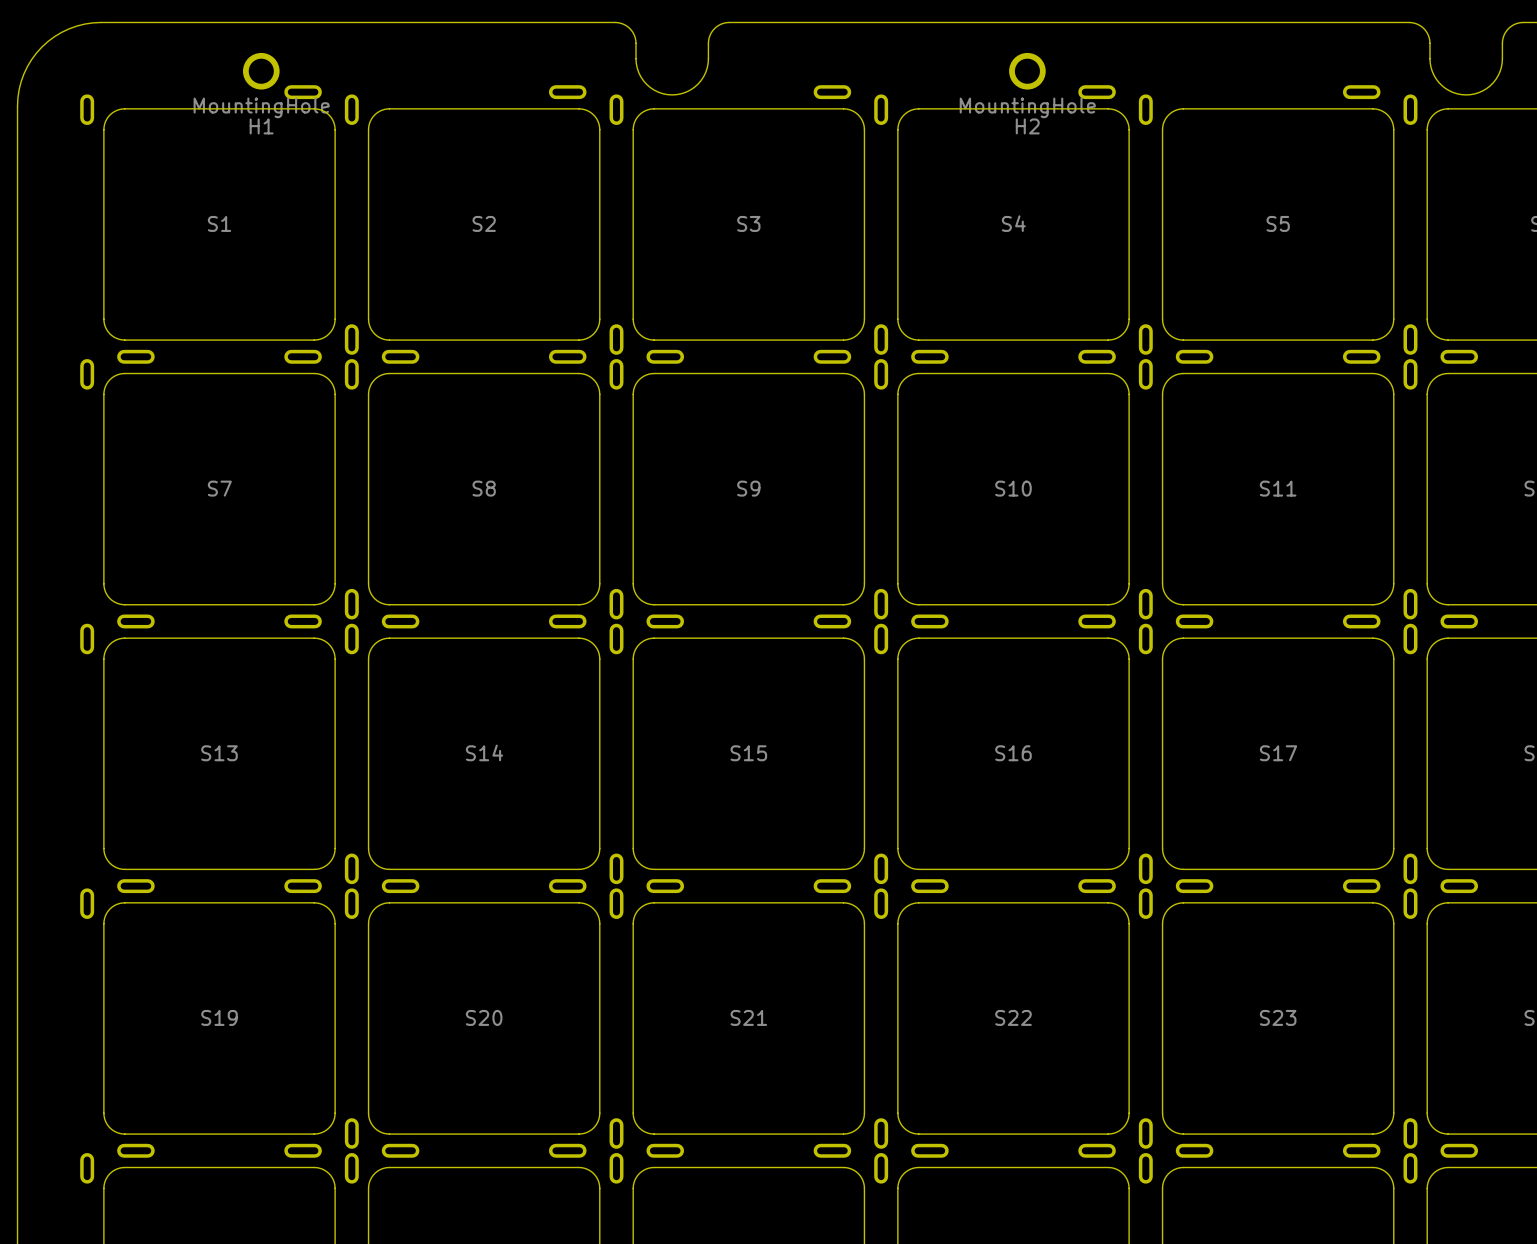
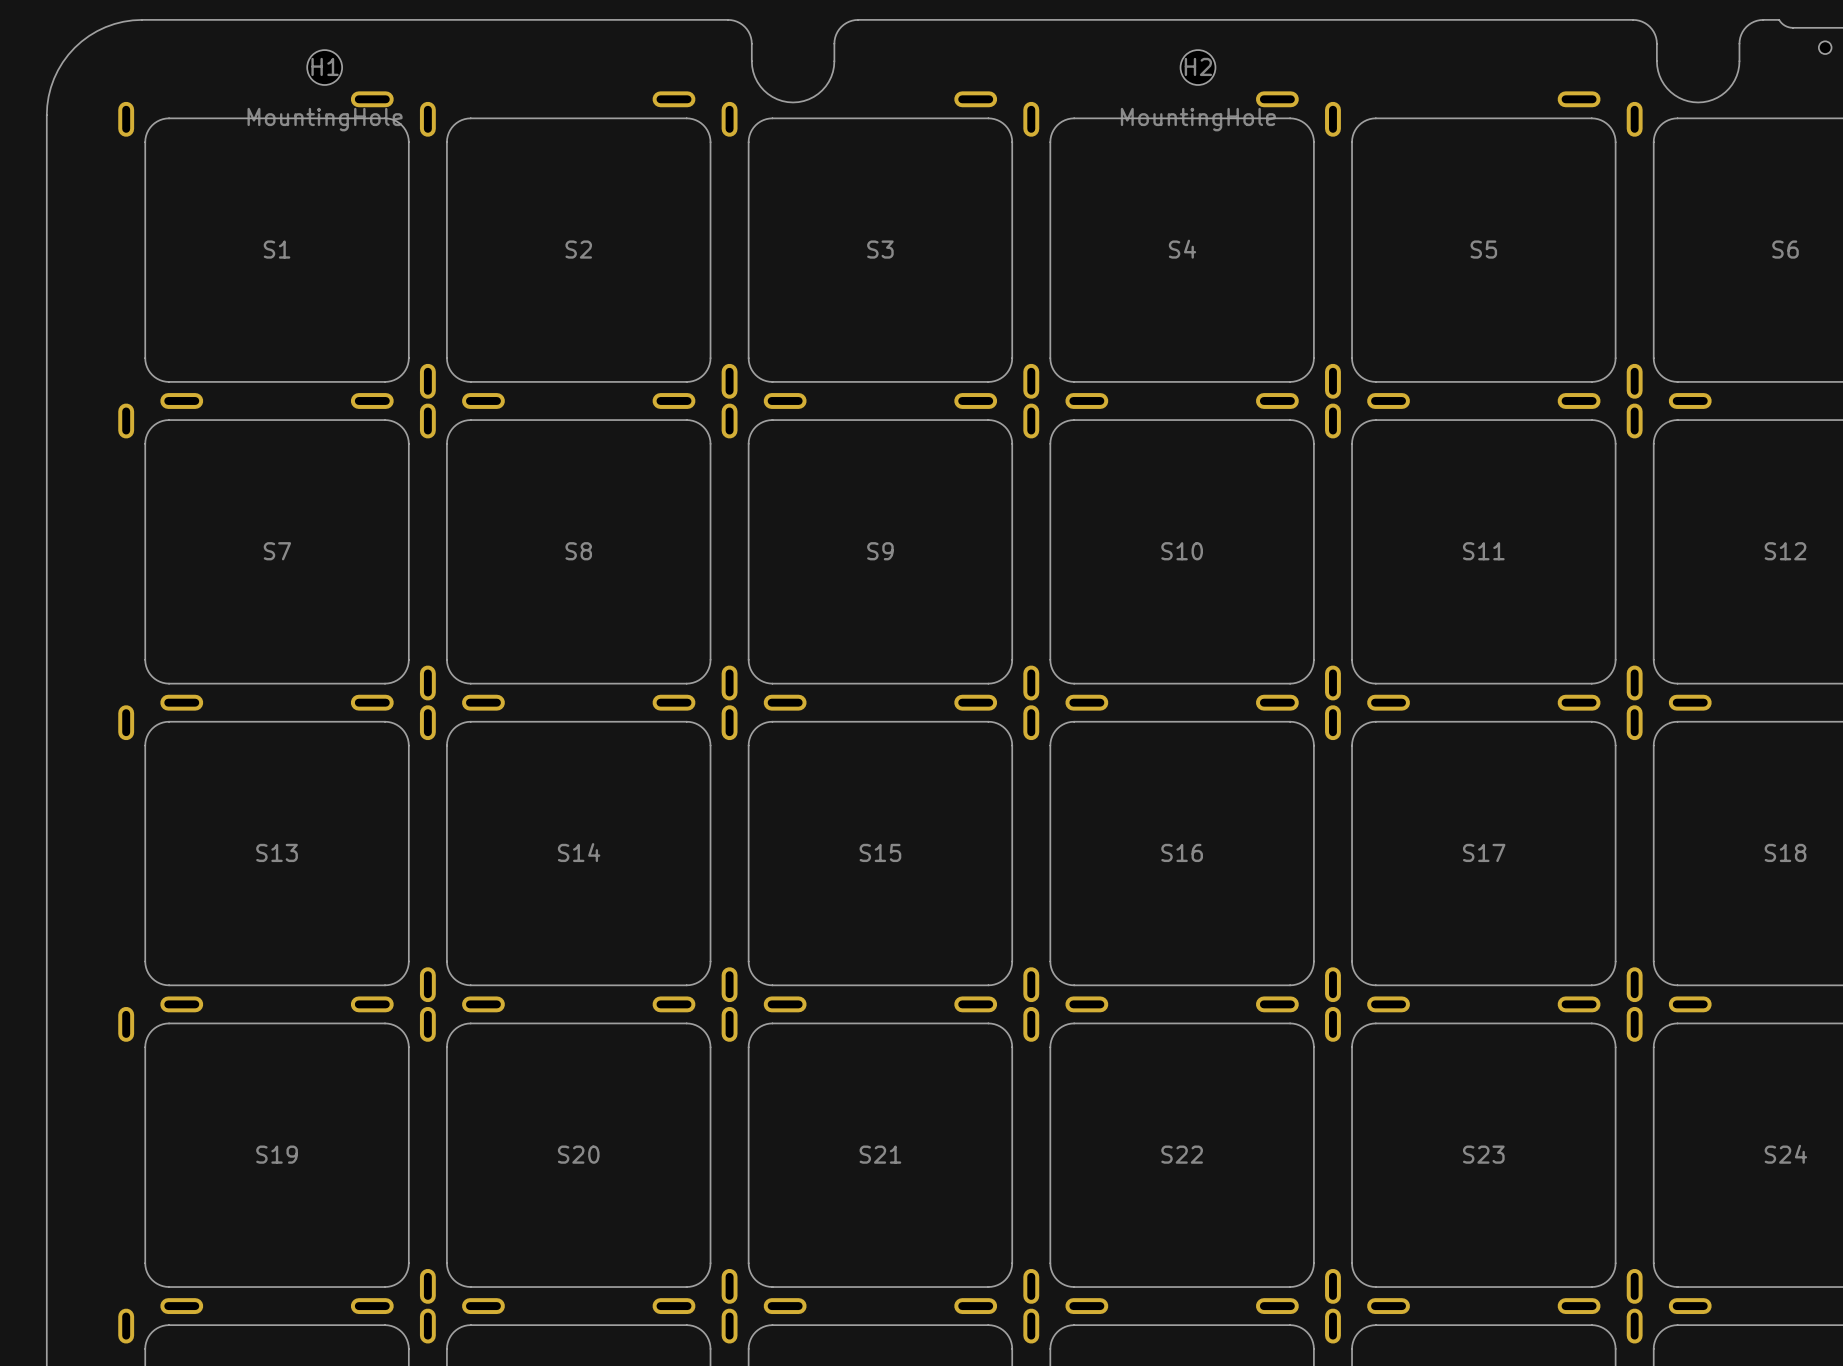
H1 footprint: [242, 52, 280, 90] -> [307, 50, 343, 86]
H2 footprint: [1009, 52, 1046, 90] -> [1180, 50, 1216, 86]
H1 name position: H1 (261, 126) -> H1 (325, 66)
H2 name position: H2 (1027, 126) -> H2 (1198, 66)

